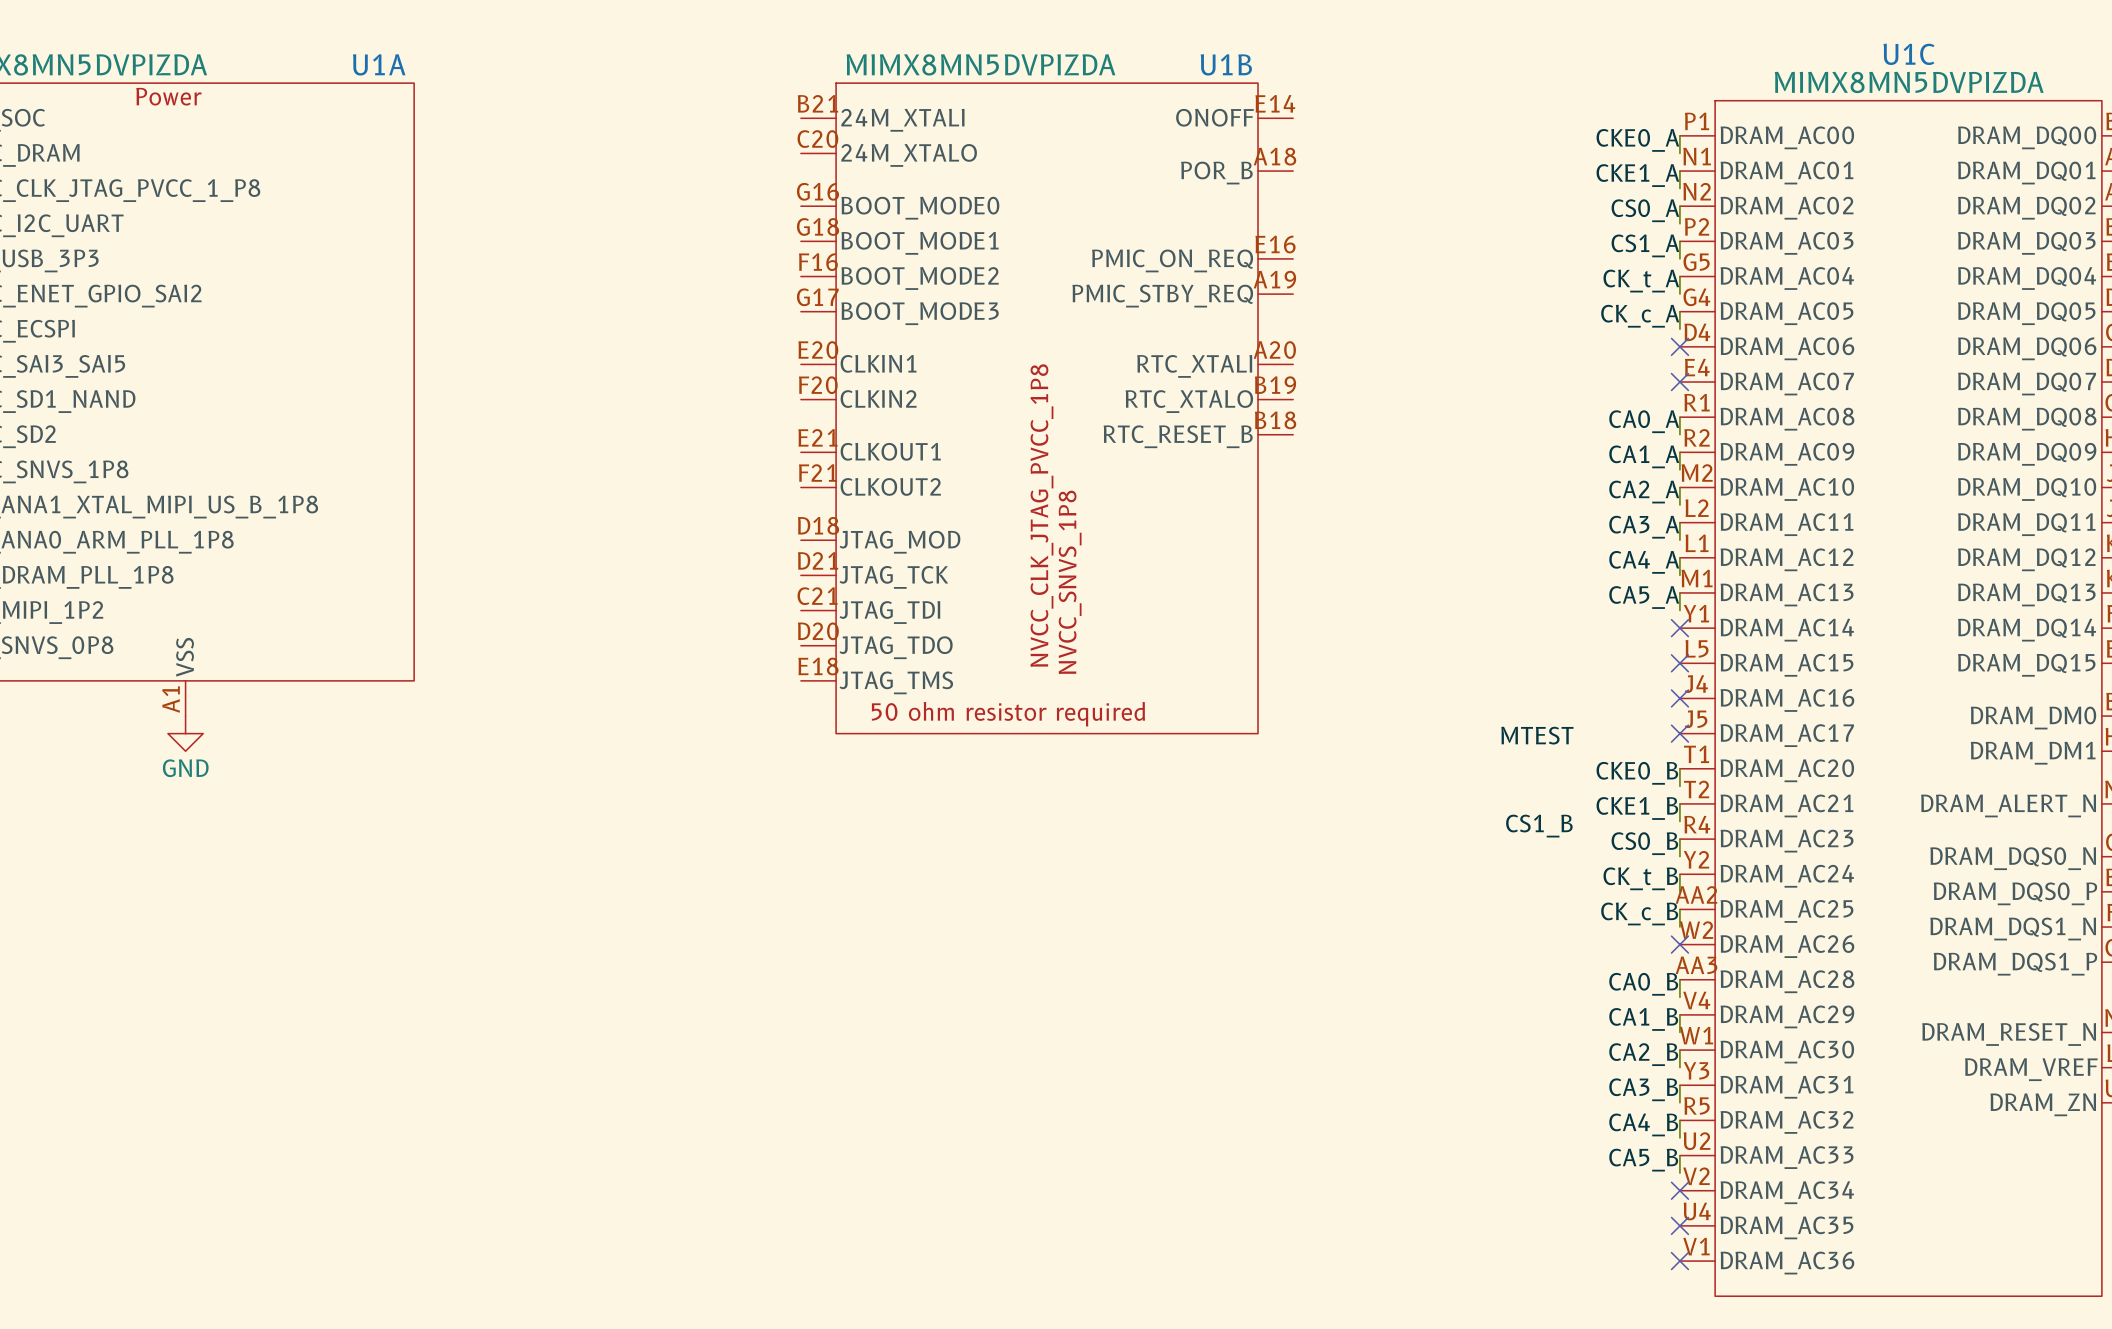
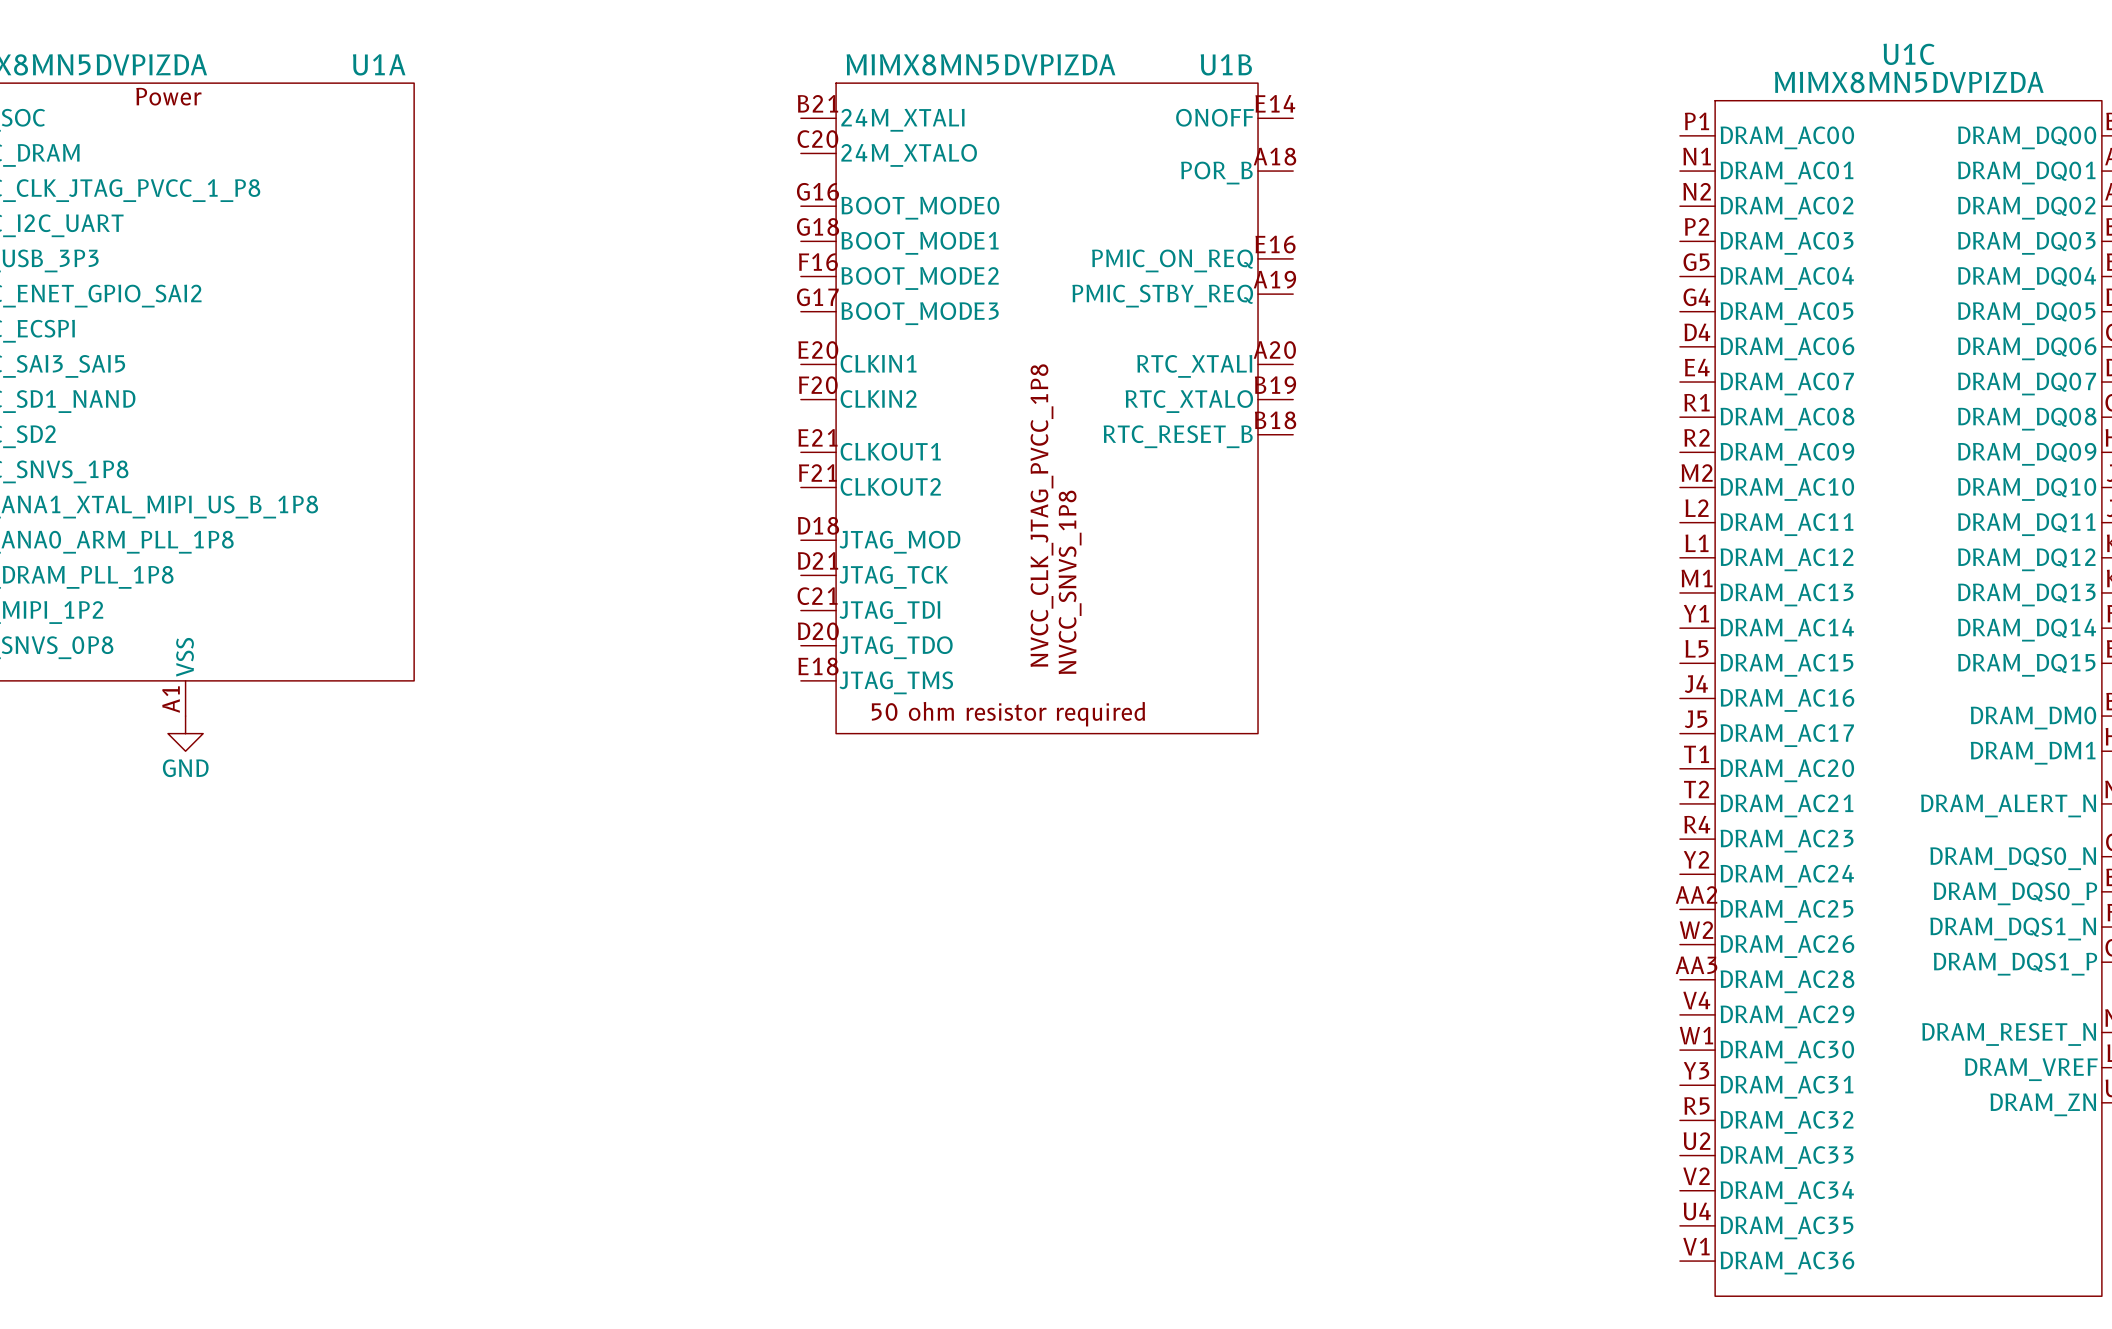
wire: (1679, 135) (1679, 153) -> none
label: CKE0_A (1637, 140) -> none
wire: (1679, 171) (1679, 188) -> none
label: CKE1_A (1637, 175) -> none
wire: (1679, 206) (1679, 223) -> none
label: CS0_A (1645, 210) -> none
wire: (1679, 241) (1679, 258) -> none
label: CS1_A (1645, 245) -> none
wire: (1679, 276) (1679, 294) -> none
label: CK_t_A (1641, 281) -> none
wire: (1679, 311) (1679, 329) -> none
label: CK_c_A (1640, 316) -> none
no-connect mark: (1679, 346) -> none
no-connect mark: (1679, 382) -> none
wire: (1679, 417) (1679, 434) -> none
label: CA0_A (1644, 421) -> none
wire: (1679, 452) (1679, 469) -> none
label: CA1_A (1644, 456) -> none
wire: (1679, 487) (1679, 505) -> none
label: CA2_A (1644, 492) -> none
wire: (1679, 522) (1679, 540) -> none
label: CA3_A (1644, 527) -> none
wire: (1679, 557) (1679, 575) -> none
label: CA4_A (1644, 562) -> none
wire: (1679, 592) (1679, 610) -> none
label: CA5_A (1644, 597) -> none
no-connect mark: (1679, 628) -> none
no-connect mark: (1679, 663) -> none
no-connect mark: (1679, 698) -> none
no-connect mark: (1679, 733) -> none
label: MTEST (1537, 735) -> none
wire: (1679, 768) (1679, 786) -> none
label: CKE0_B (1637, 773) -> none
wire: (1679, 803) (1679, 821) -> none
label: CKE1_B (1637, 808) -> none
label: CS1_B (1539, 826) -> none
wire: (1679, 839) (1679, 856) -> none
label: CS0_B (1644, 843) -> none
wire: (1679, 874) (1679, 891) -> none
label: CK_t_B (1640, 878) -> none
wire: (1679, 909) (1679, 927) -> none
label: CK_c_B (1639, 913) -> none
no-connect mark: (1679, 944) -> none
wire: (1679, 979) (1679, 997) -> none
label: CA0_B (1643, 984) -> none
wire: (1679, 1014) (1679, 1032) -> none
label: CA1_B (1643, 1019) -> none
wire: (1679, 1050) (1679, 1067) -> none
label: CA2_B (1643, 1054) -> none
wire: (1679, 1085) (1679, 1102) -> none
label: CA3_B (1643, 1089) -> none
wire: (1679, 1120) (1679, 1137) -> none
label: CA4_B (1643, 1124) -> none
wire: (1679, 1155) (1679, 1173) -> none
label: CA5_B (1643, 1160) -> none
no-connect mark: (1679, 1190) -> none
no-connect mark: (1679, 1225) -> none
no-connect mark: (1679, 1261) -> none

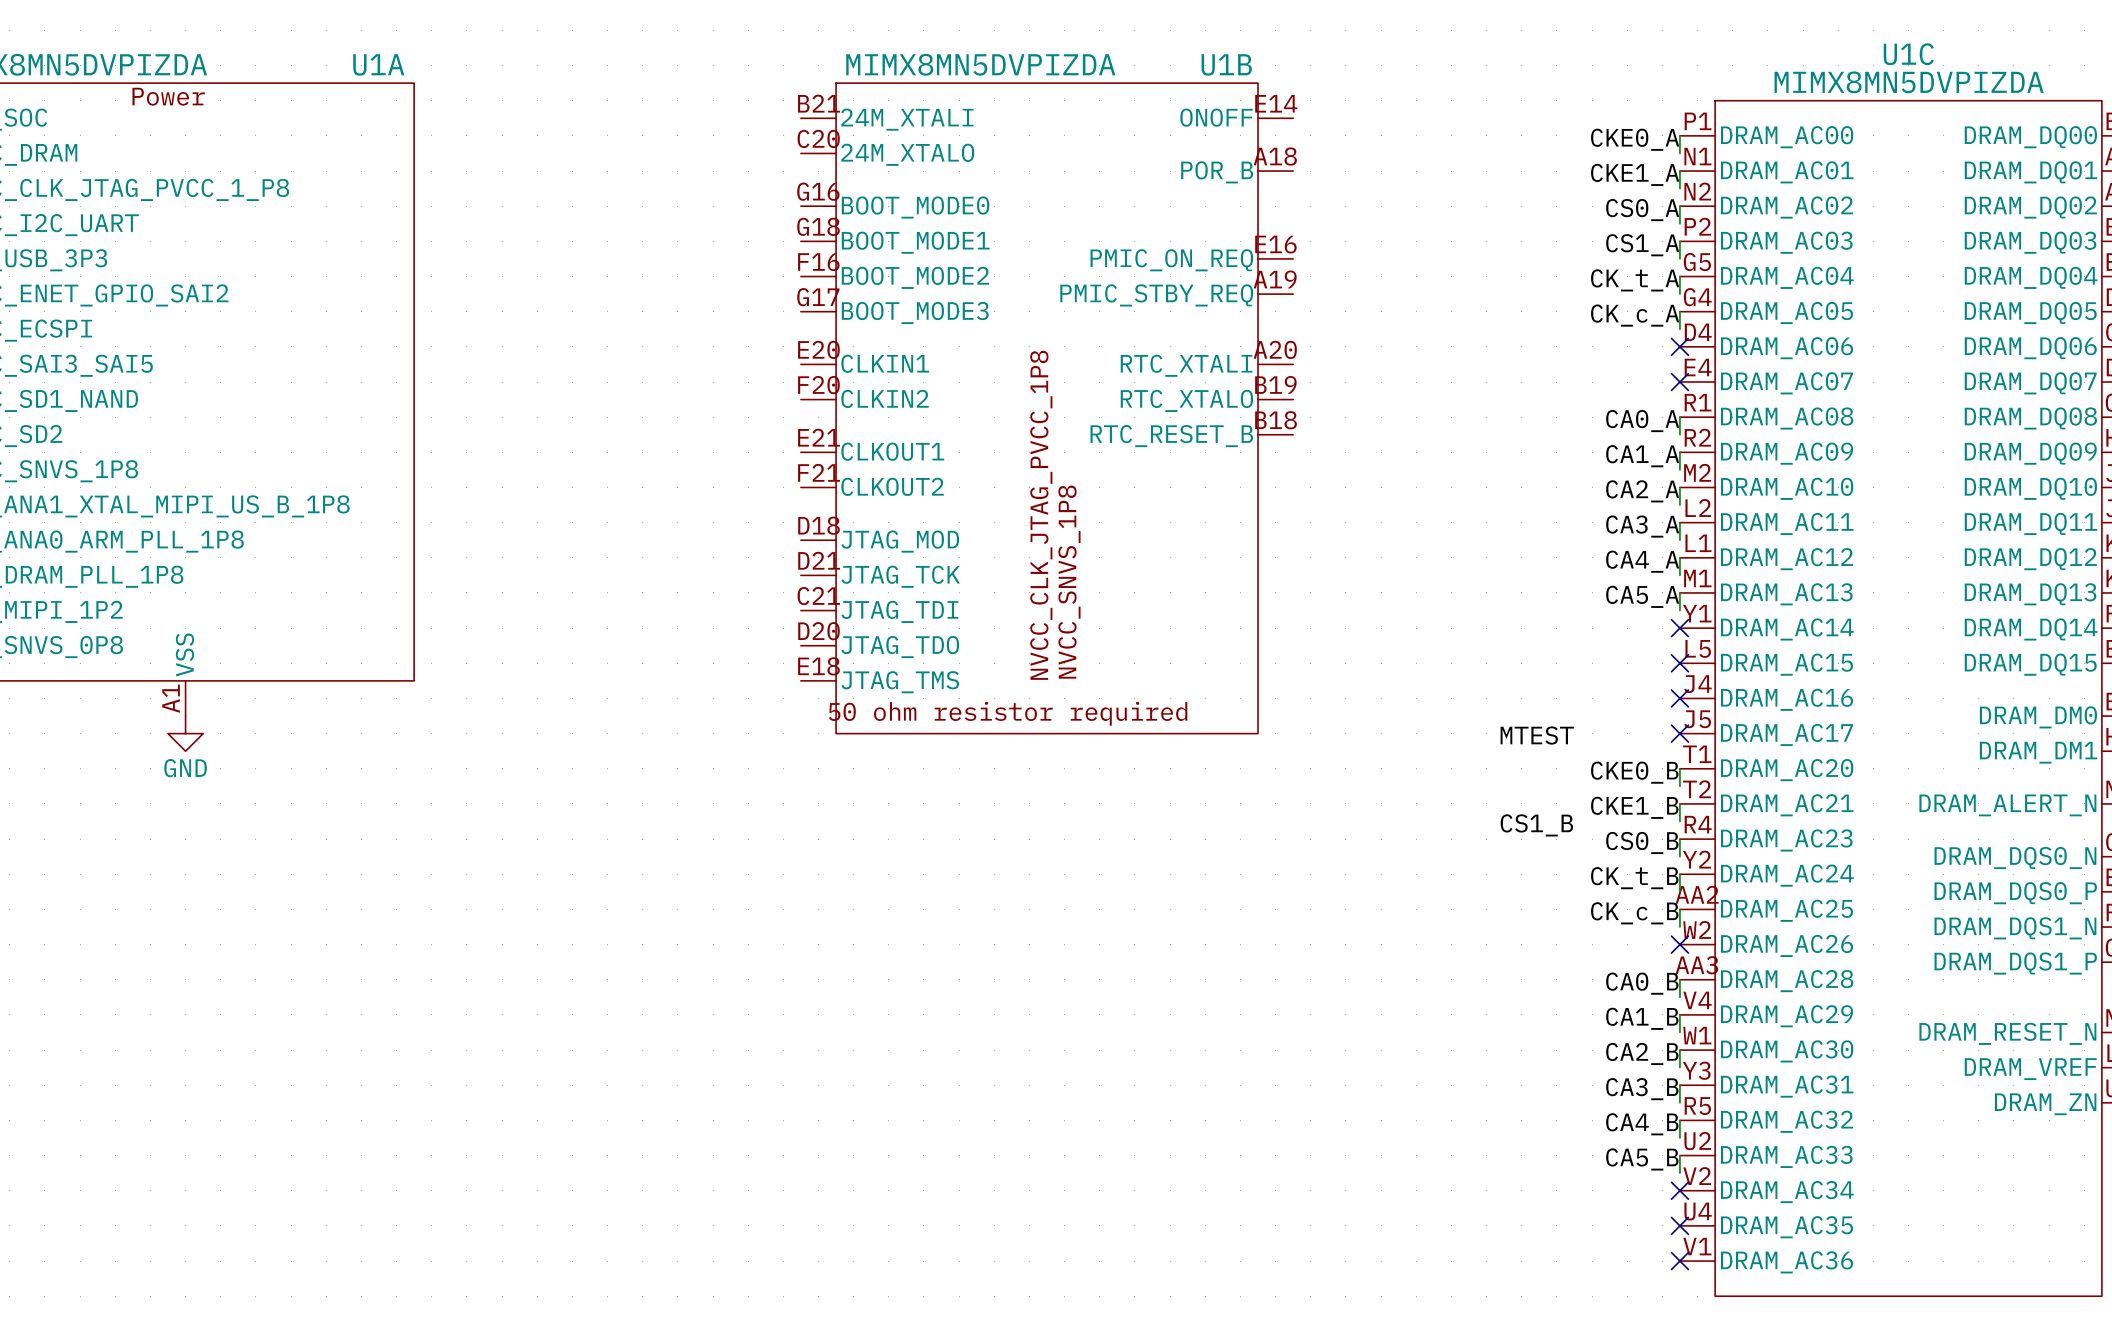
wire: none -> (1679, 135) (1679, 153)
label: none -> CKE0_A (1635, 139)
wire: none -> (1679, 171) (1679, 188)
label: none -> CKE1_A (1635, 174)
wire: none -> (1679, 206) (1679, 223)
label: none -> CS0_A (1642, 210)
wire: none -> (1679, 241) (1679, 258)
label: none -> CS1_A (1642, 245)
wire: none -> (1679, 276) (1679, 294)
label: none -> CK_t_A (1635, 280)
wire: none -> (1679, 311) (1679, 329)
label: none -> CK_c_A (1635, 315)
no-connect mark: none -> (1679, 346)
no-connect mark: none -> (1679, 382)
wire: none -> (1679, 417) (1679, 434)
label: none -> CA0_A (1642, 421)
wire: none -> (1679, 452) (1679, 469)
label: none -> CA1_A (1642, 456)
wire: none -> (1679, 487) (1679, 505)
label: none -> CA2_A (1642, 491)
wire: none -> (1679, 522) (1679, 540)
label: none -> CA3_A (1642, 526)
wire: none -> (1679, 557) (1679, 575)
label: none -> CA4_A (1642, 561)
wire: none -> (1679, 592) (1679, 610)
label: none -> CA5_A (1642, 596)
no-connect mark: none -> (1679, 628)
no-connect mark: none -> (1679, 663)
no-connect mark: none -> (1679, 698)
no-connect mark: none -> (1679, 733)
label: none -> MTEST (1537, 735)
wire: none -> (1679, 768) (1679, 786)
label: none -> CKE0_B (1634, 772)
wire: none -> (1679, 803) (1679, 821)
label: none -> CKE1_B (1634, 807)
label: none -> CS1_B (1536, 825)
wire: none -> (1679, 839) (1679, 856)
label: none -> CS0_B (1642, 842)
wire: none -> (1679, 874) (1679, 891)
label: none -> CK_t_B (1634, 878)
wire: none -> (1679, 909) (1679, 927)
label: none -> CK_c_B (1634, 913)
no-connect mark: none -> (1679, 944)
wire: none -> (1679, 979) (1679, 997)
label: none -> CA0_B (1642, 983)
wire: none -> (1679, 1014) (1679, 1032)
label: none -> CA1_B (1642, 1018)
wire: none -> (1679, 1050) (1679, 1067)
label: none -> CA2_B (1642, 1053)
wire: none -> (1679, 1085) (1679, 1102)
label: none -> CA3_B (1642, 1089)
wire: none -> (1679, 1120) (1679, 1137)
label: none -> CA4_B (1642, 1124)
wire: none -> (1679, 1155) (1679, 1173)
label: none -> CA5_B (1642, 1159)
no-connect mark: none -> (1679, 1190)
no-connect mark: none -> (1679, 1225)
no-connect mark: none -> (1679, 1261)

